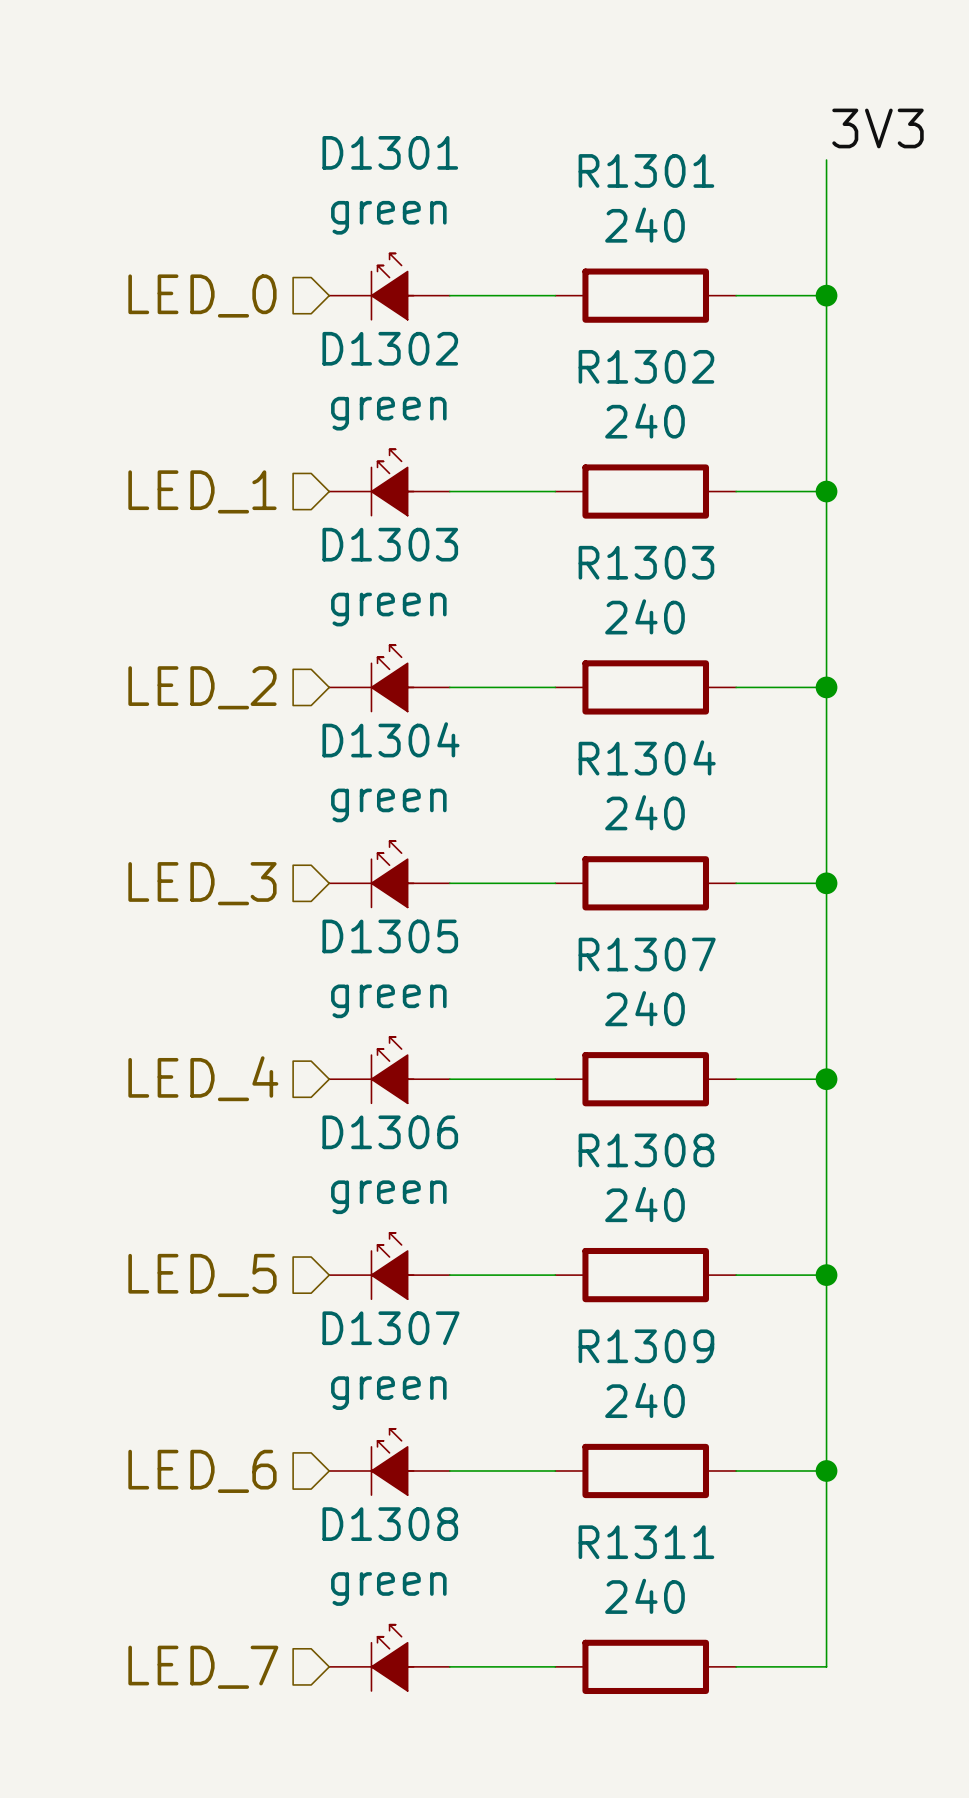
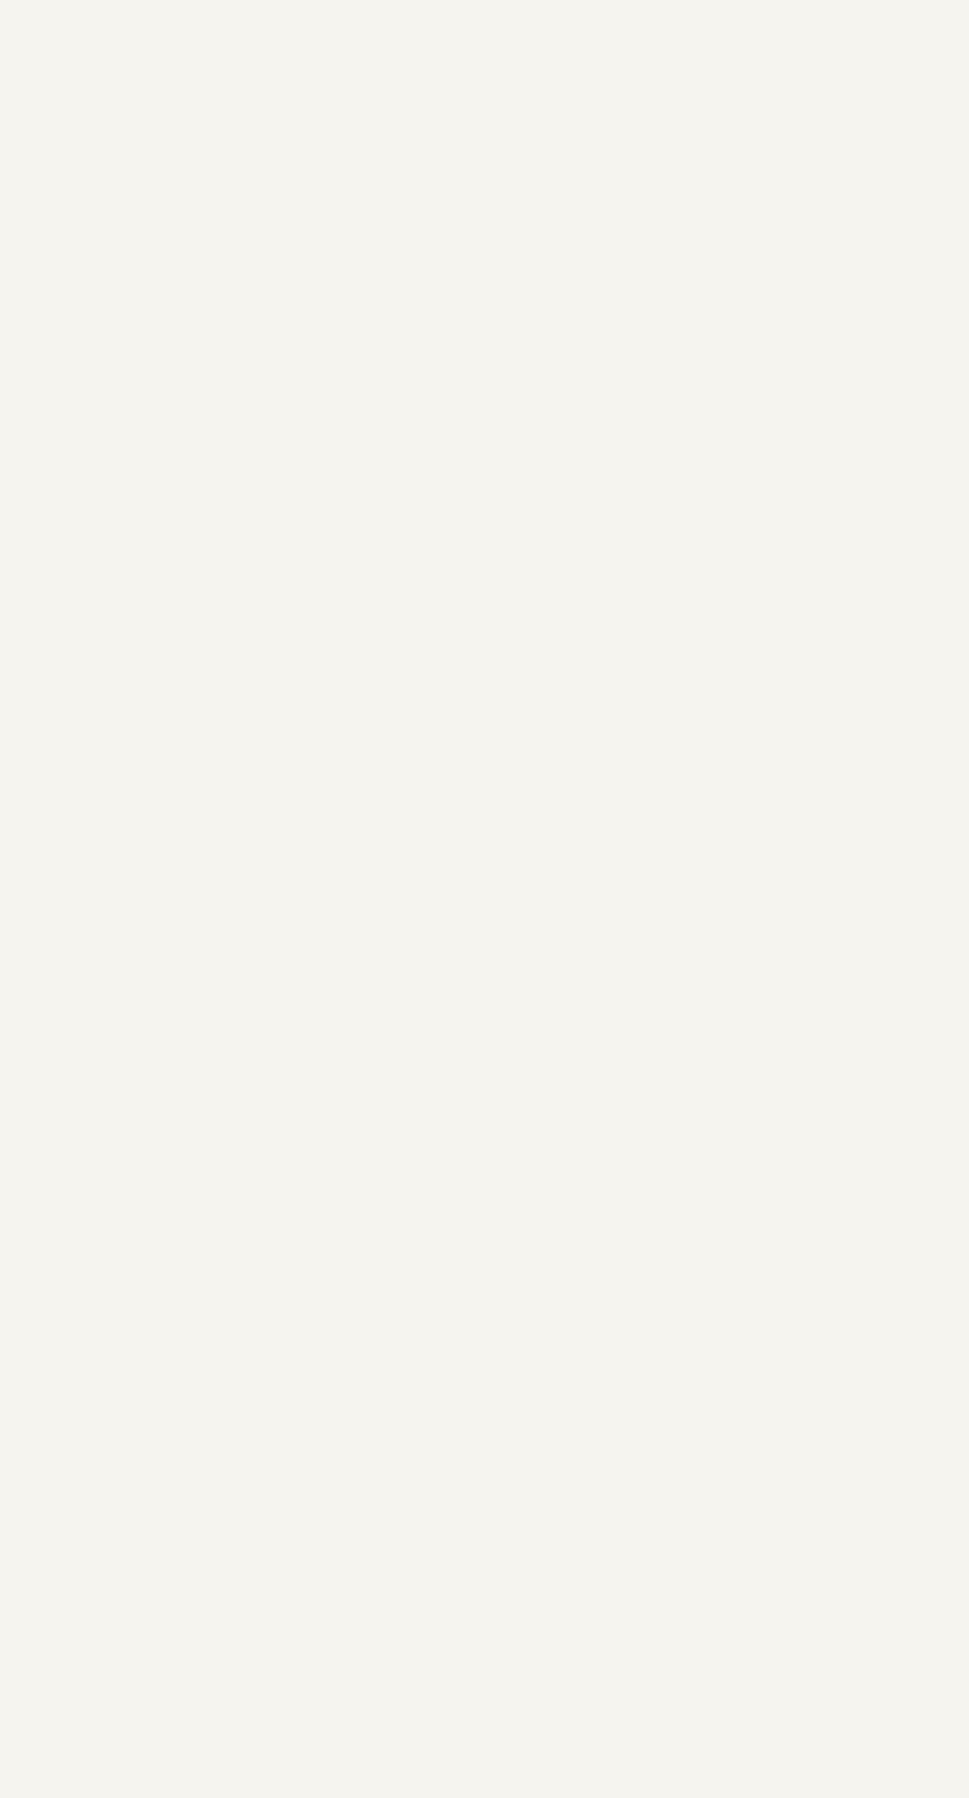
label: 3V3 (878, 128) -> none
wire: (826, 160) (826, 1666) (736, 1666) -> none
D1301: green (389, 286) -> none
wire: (449, 295) (555, 295) -> none
R1301: 240 (645, 295) -> none
wire: (736, 295) (826, 295) -> none
junction: (826, 295) -> none
hierarchical label: LED_0 (202, 296) -> none
D1302: green (389, 482) -> none
hierarchical label: LED_1 (202, 491) -> none
wire: (449, 491) (555, 491) -> none
R1302: 240 (645, 491) -> none
wire: (736, 491) (826, 491) -> none
junction: (826, 491) -> none
D1303: green (389, 678) -> none
hierarchical label: LED_2 (202, 687) -> none
wire: (449, 687) (555, 687) -> none
R1303: 240 (645, 687) -> none
wire: (736, 687) (826, 687) -> none
junction: (826, 687) -> none
D1304: green (389, 874) -> none
hierarchical label: LED_3 (202, 883) -> none
wire: (449, 883) (555, 883) -> none
R1304: 240 (645, 883) -> none
wire: (736, 883) (826, 883) -> none
junction: (826, 883) -> none
D1305: green (389, 1070) -> none
hierarchical label: LED_4 (203, 1078) -> none
wire: (449, 1079) (555, 1079) -> none
R1307: 240 (645, 1079) -> none
wire: (736, 1079) (826, 1079) -> none
junction: (826, 1079) -> none
D1306: green (389, 1266) -> none
hierarchical label: LED_5 (202, 1275) -> none
wire: (449, 1275) (555, 1275) -> none
R1308: 240 (645, 1275) -> none
wire: (736, 1275) (826, 1275) -> none
junction: (826, 1275) -> none
D1307: green (389, 1461) -> none
wire: (449, 1470) (555, 1470) -> none
R1309: 240 (645, 1470) -> none
wire: (736, 1470) (826, 1470) -> none
junction: (826, 1470) -> none
hierarchical label: LED_6 (202, 1471) -> none
D1308: green (389, 1657) -> none
wire: (449, 1666) (555, 1666) -> none
R1311: 240 (645, 1666) -> none
hierarchical label: LED_7 (203, 1667) -> none

